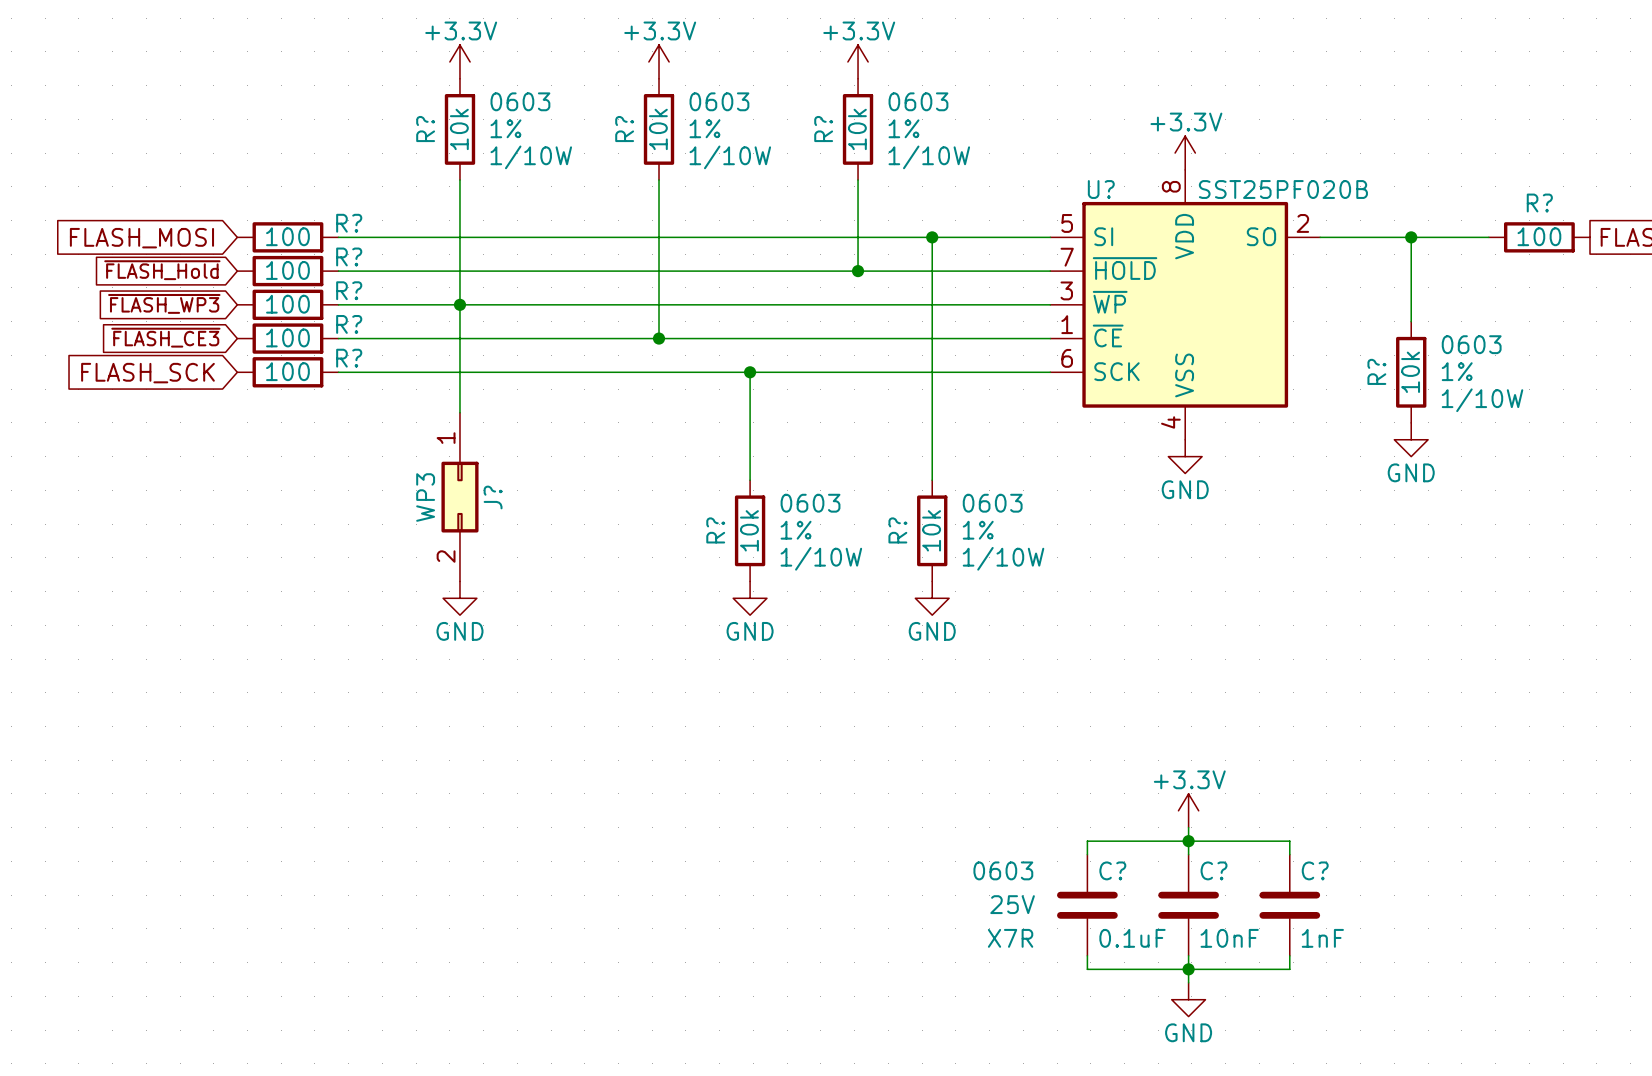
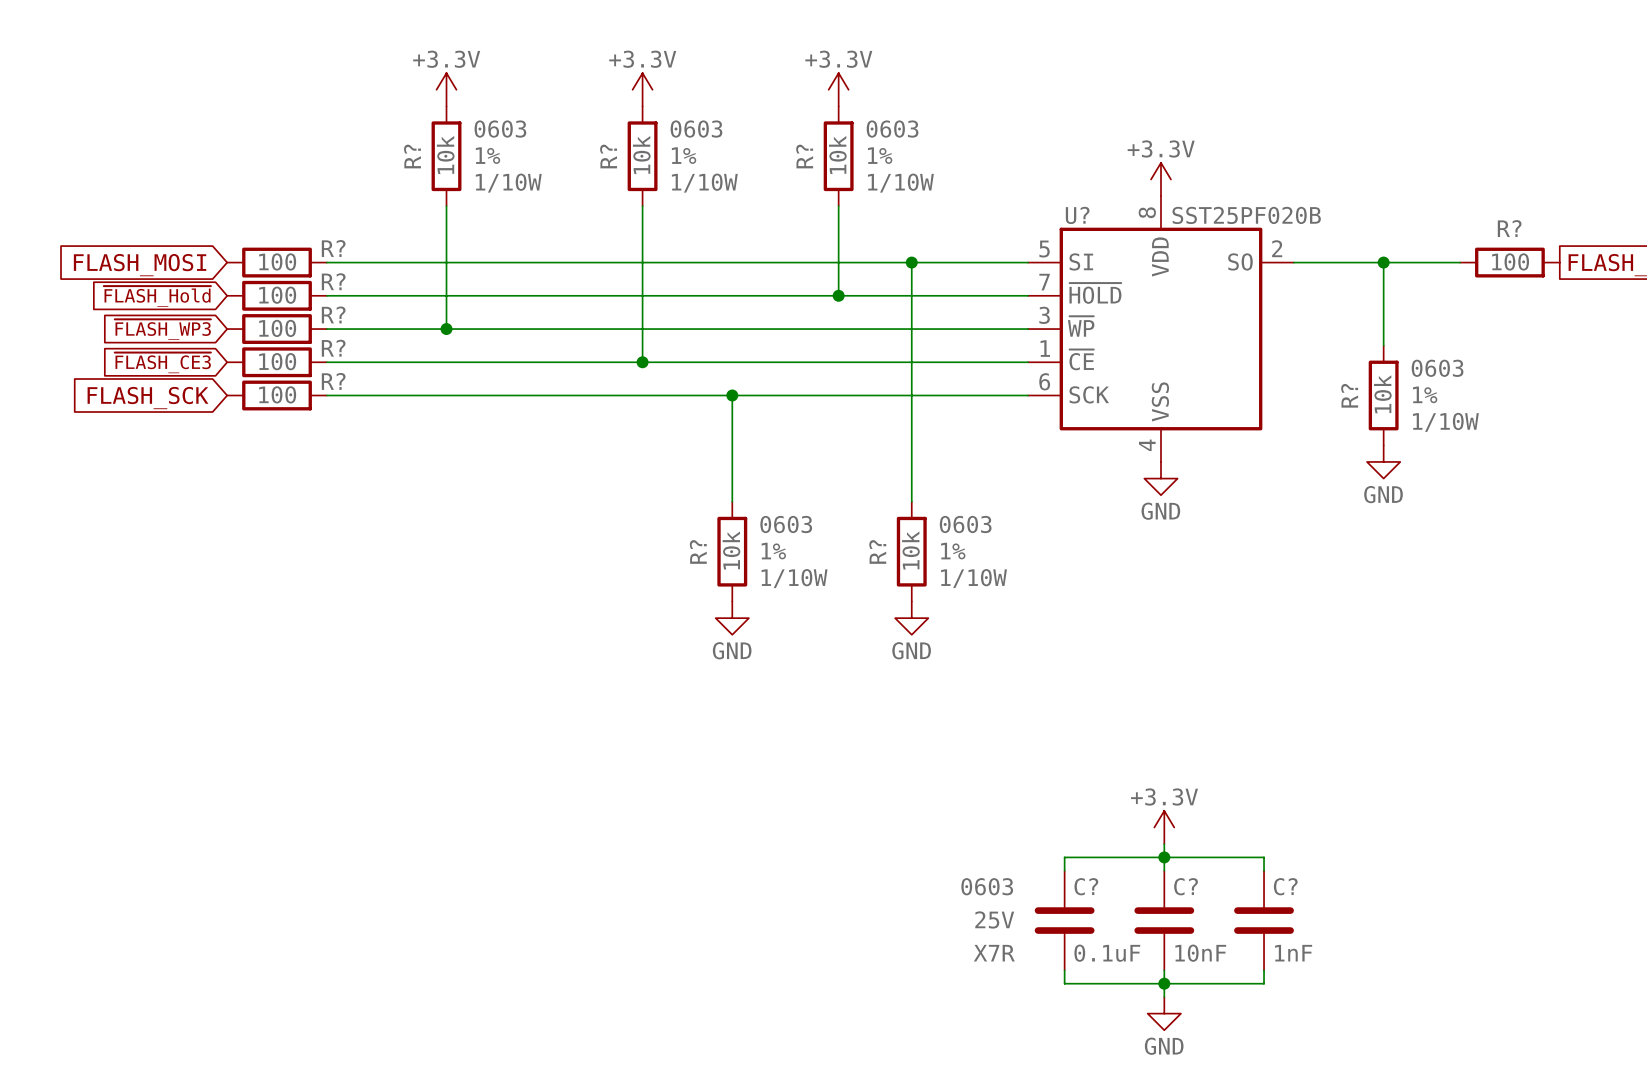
wire: (459, 304) (459, 412) -> none
J?: WP3 (459, 497) -> none
power symbol: GND (459, 598) -> none

